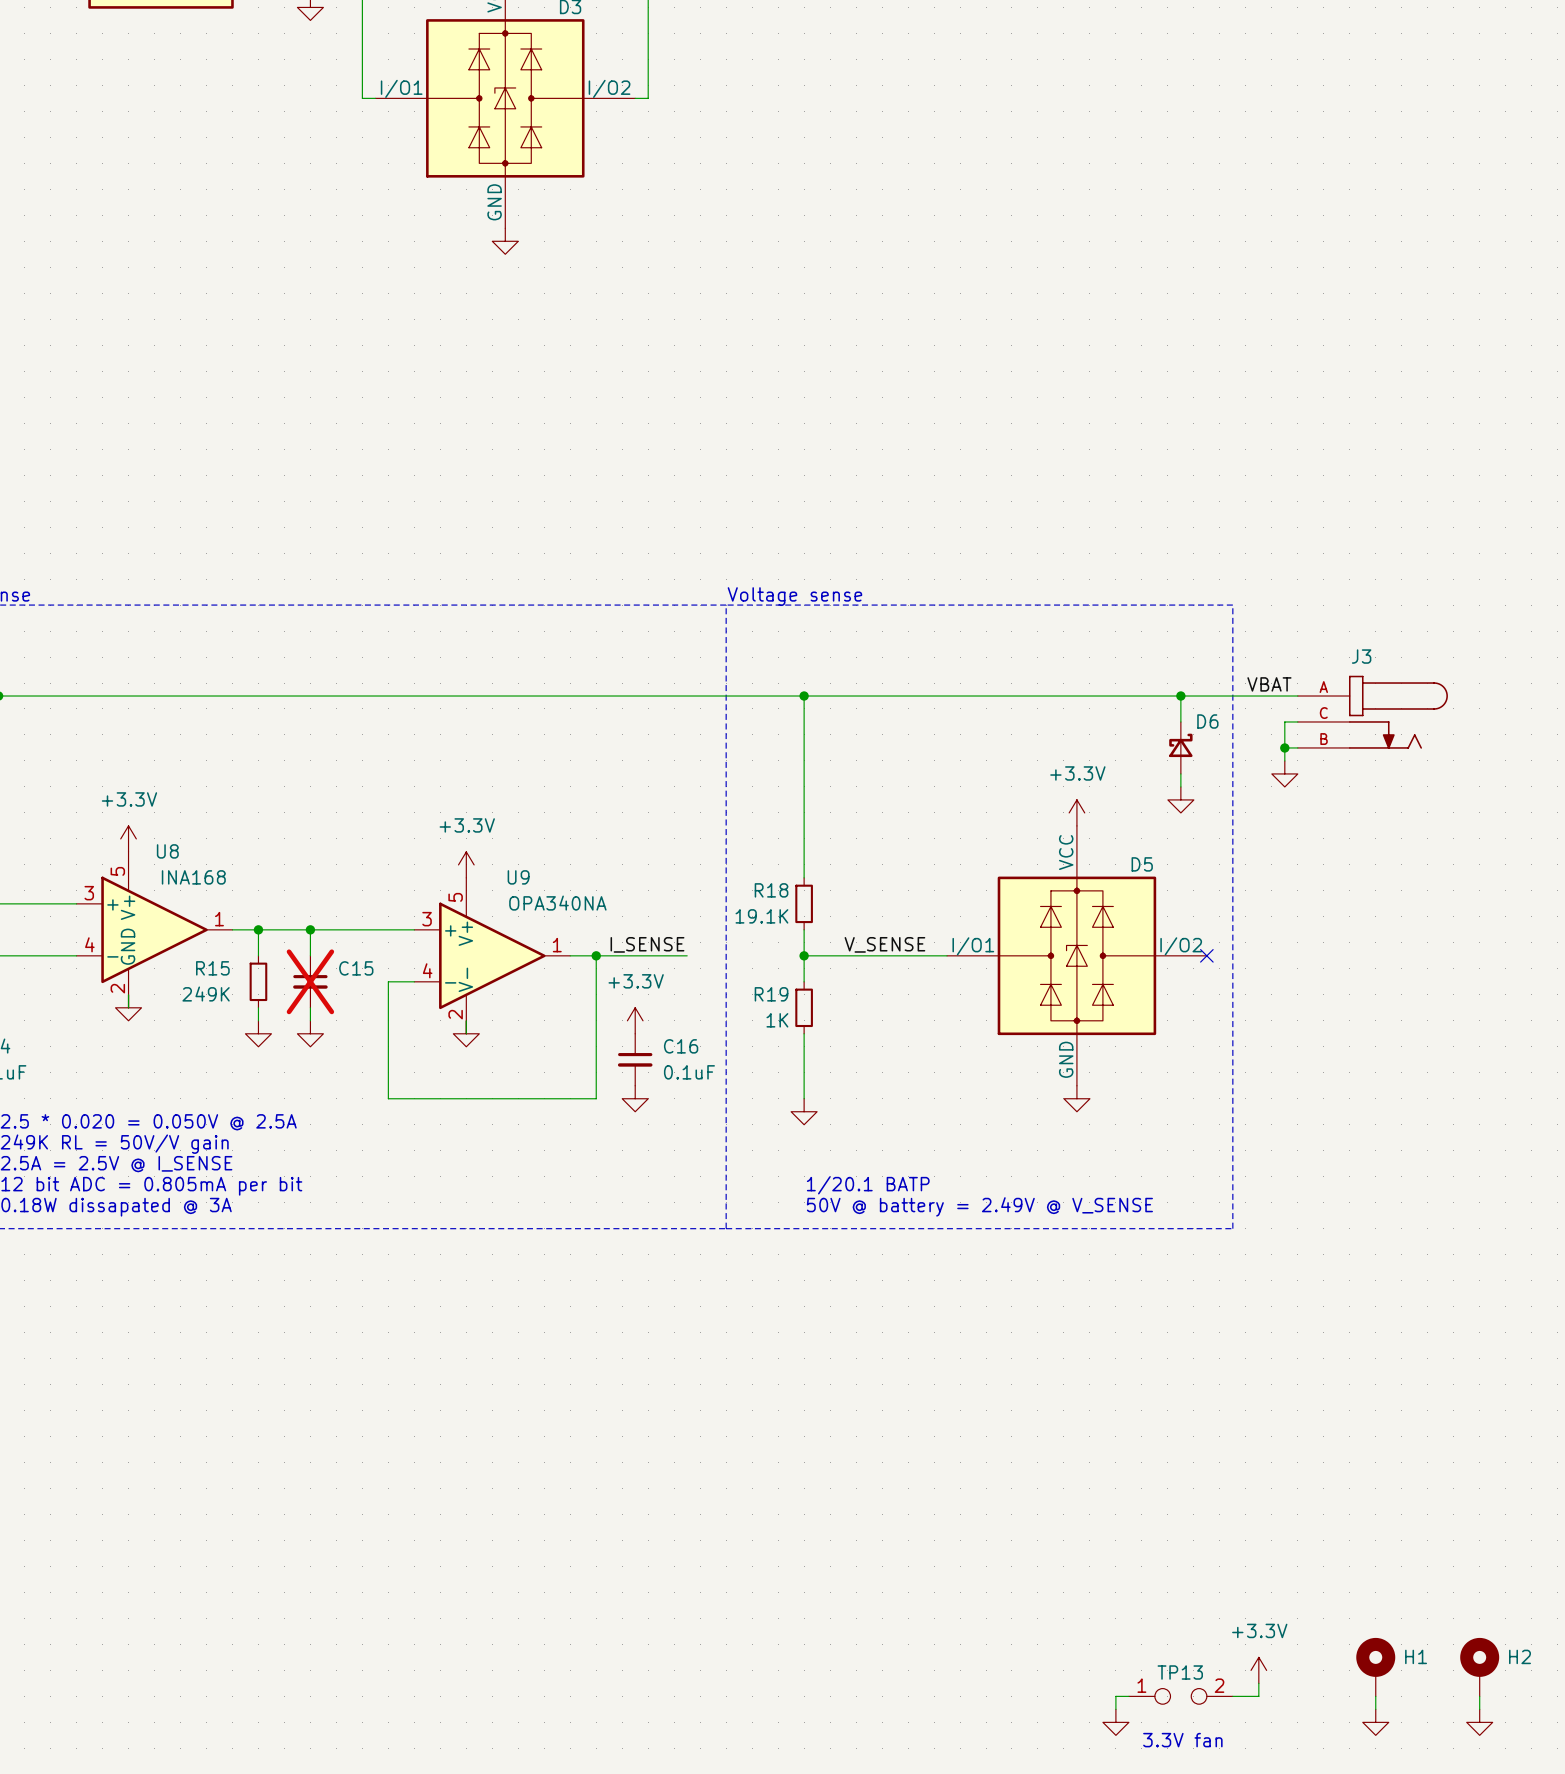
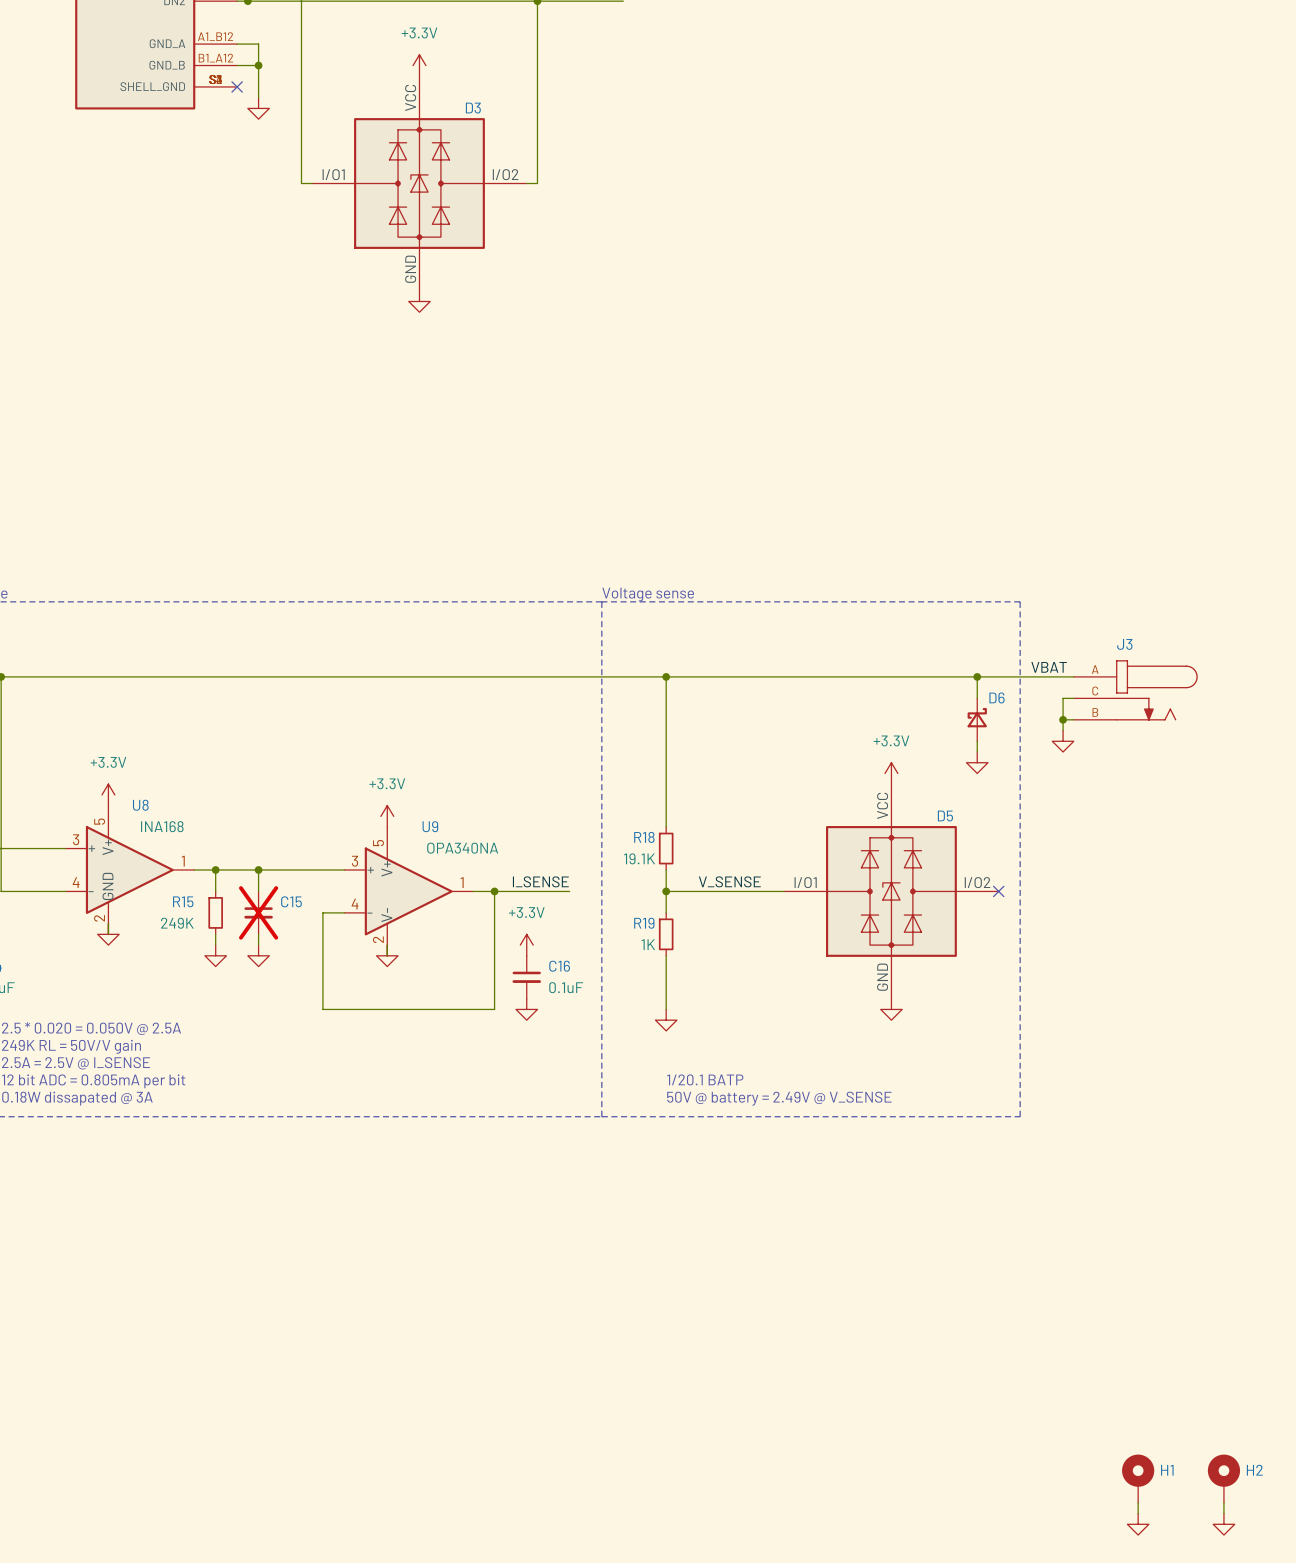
power symbol: +3.3V (1258, 1670) -> none
wire: (1258, 1683) (1258, 1696) (1232, 1696) -> none
wire: (1128, 1696) (1115, 1696) (1115, 1709) -> none
TP13: (1180, 1696) -> none
power symbol: (1115, 1722) -> none
text: 3.3V fan (1182, 1740) -> none

